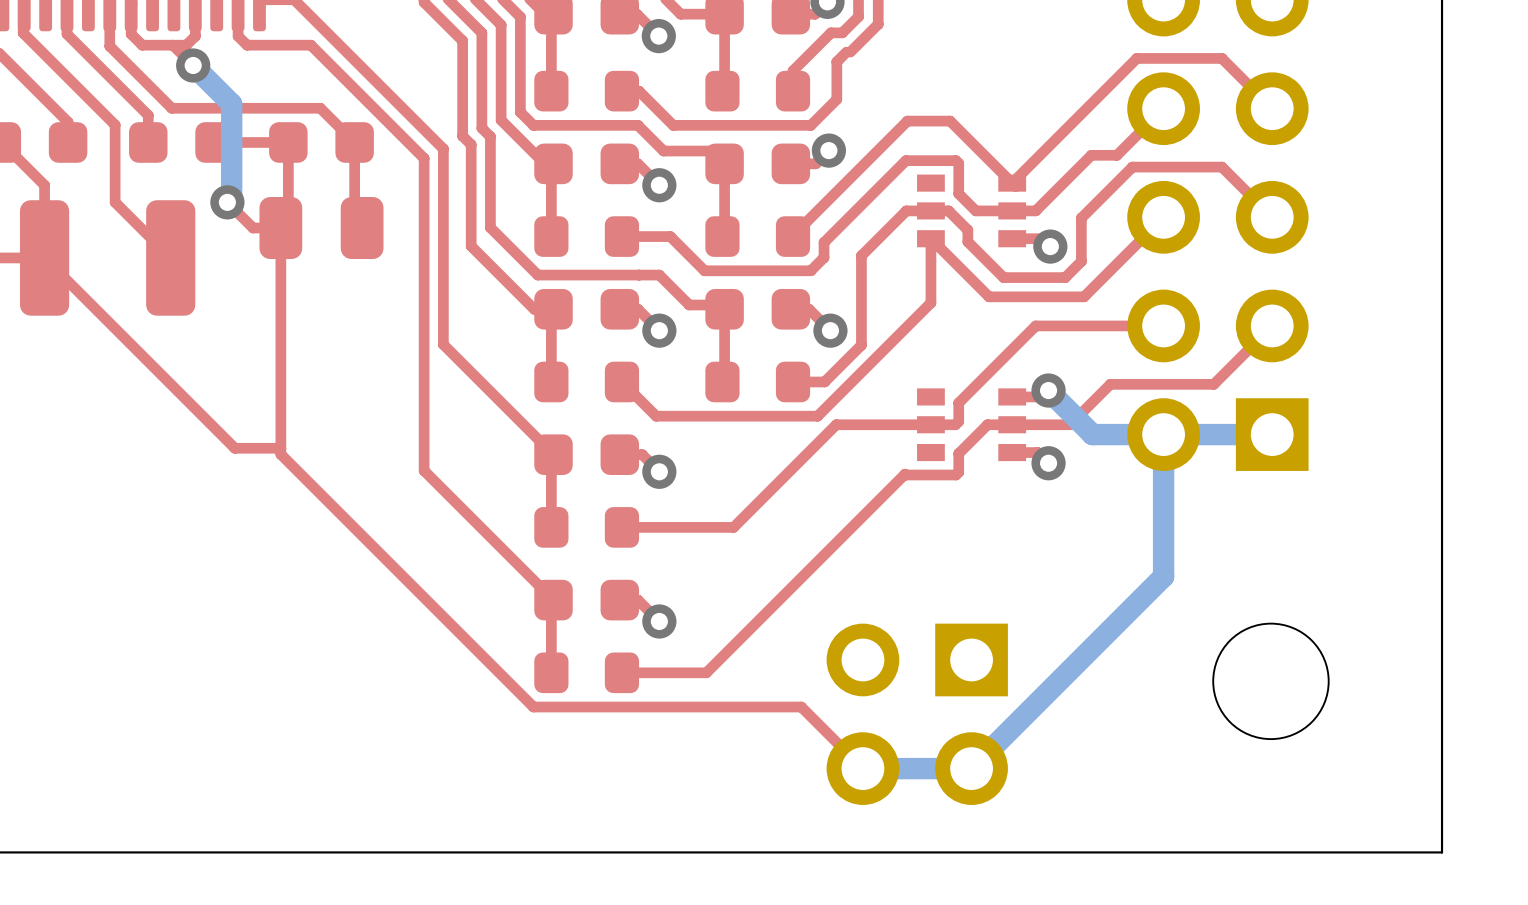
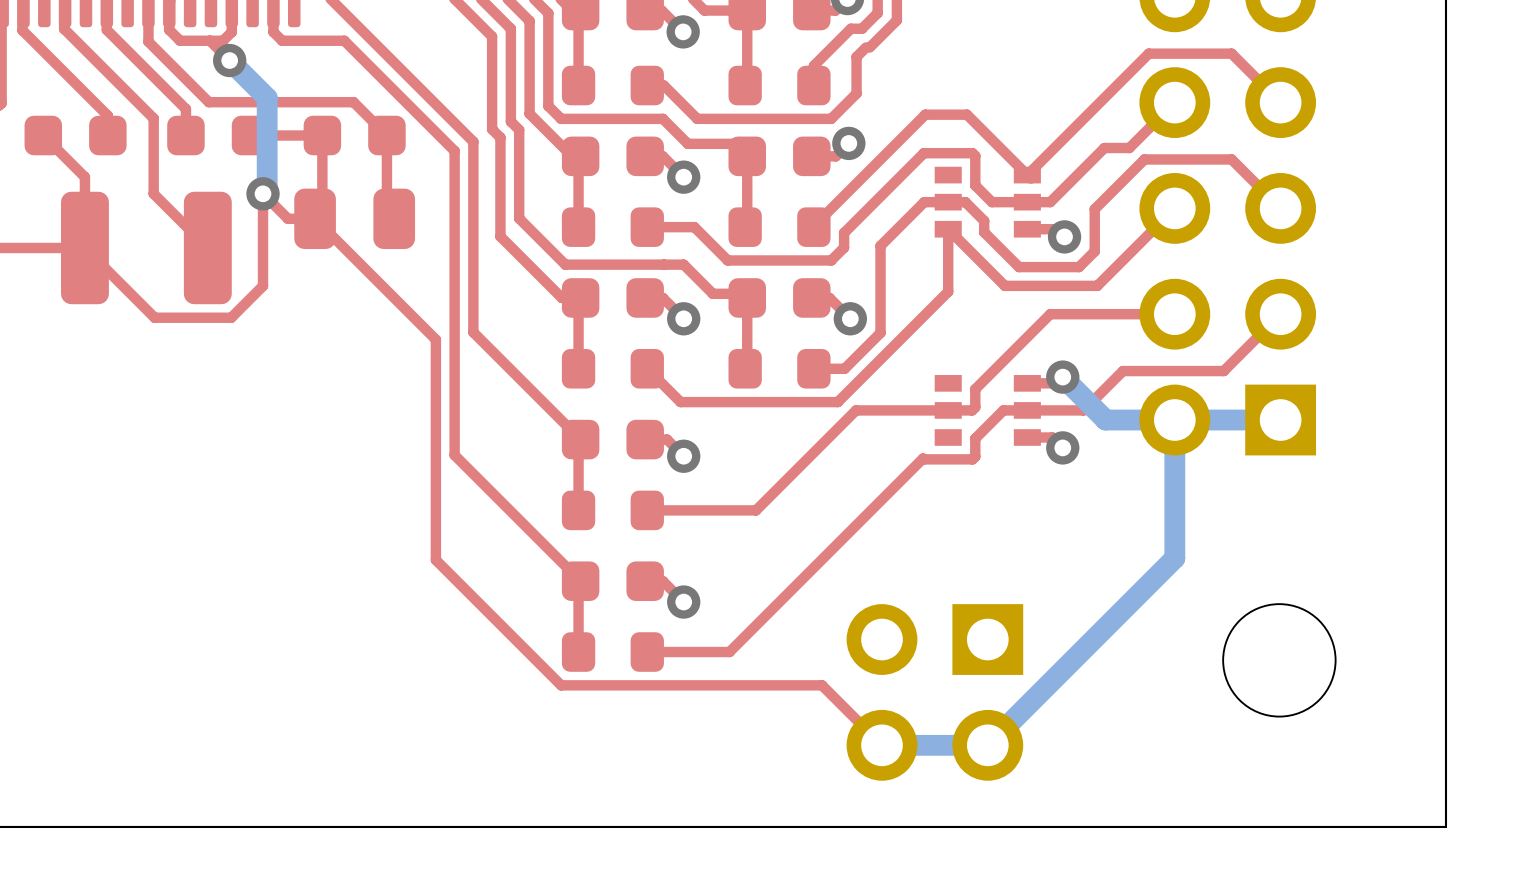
top track: (280, 228) (280, 454) (404, 578) -> (315, 218) (435, 339) (435, 560)
top track: (116, 329) (234, 448) (280, 448) -> (154, 317) (231, 317) (263, 285) (263, 193)

